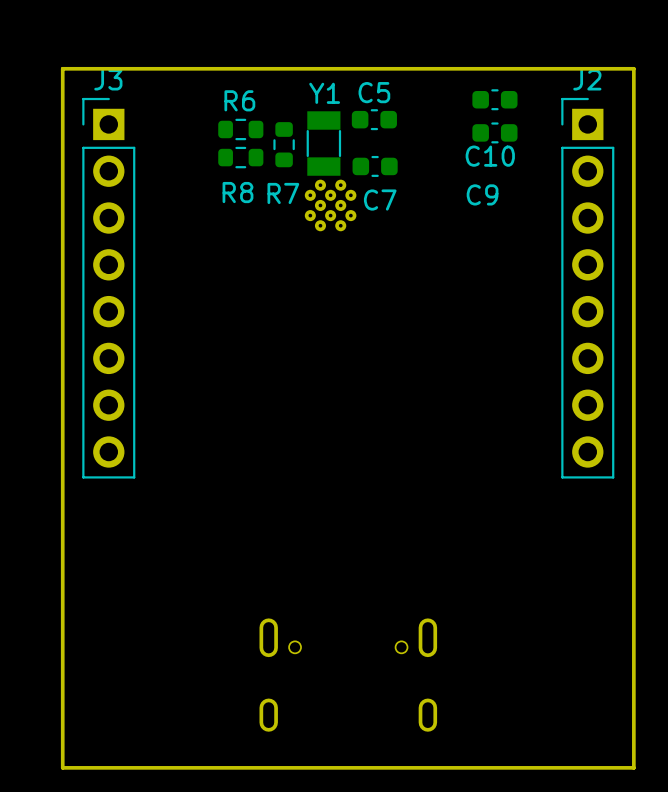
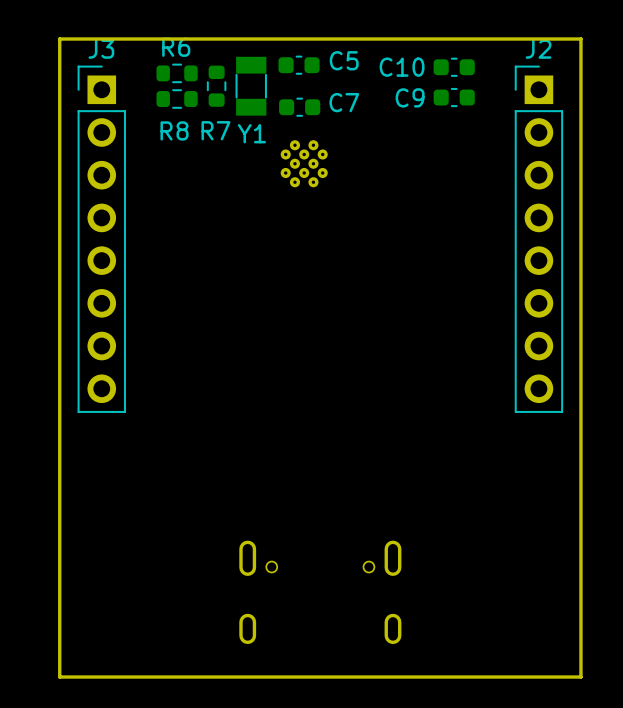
Y1 name position: Y1 (324, 93) -> Y1 (251, 133)
C5 position: (374, 119) -> (299, 65)
R6 position: (240, 129) -> (177, 73)
Y1 position: (323, 143) -> (251, 86)
R7 position: (284, 144) -> (216, 86)
C10 name position: C10 (490, 156) -> C10 (402, 67)
R8 position: (240, 157) -> (177, 99)
C7 position: (375, 166) -> (299, 107)
C9 name position: C9 (482, 194) -> C9 (410, 97)
C7 name position: C7 (380, 200) -> C7 (344, 102)

